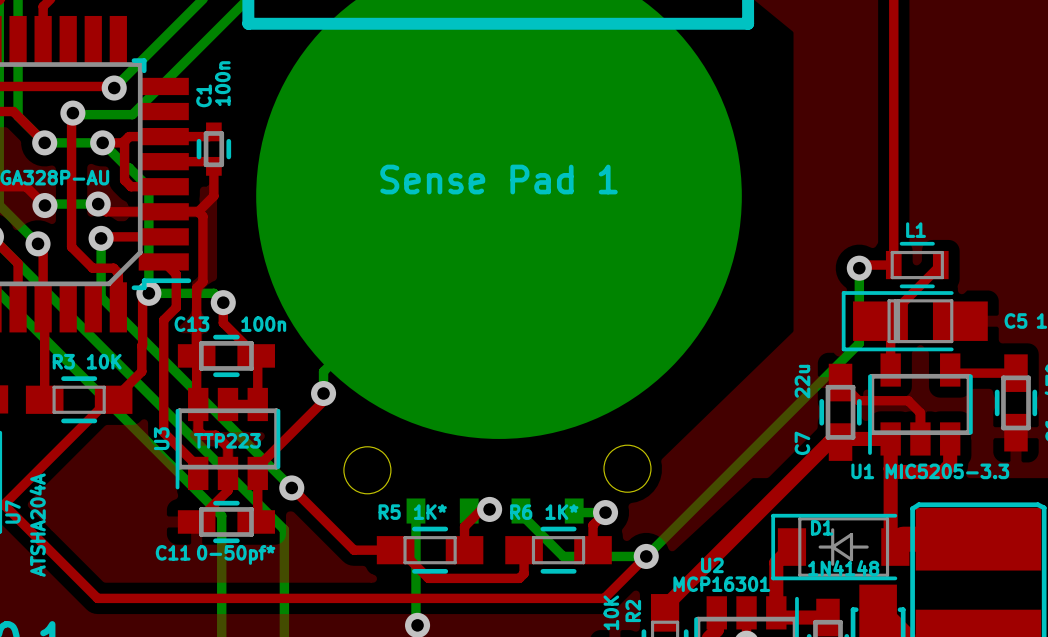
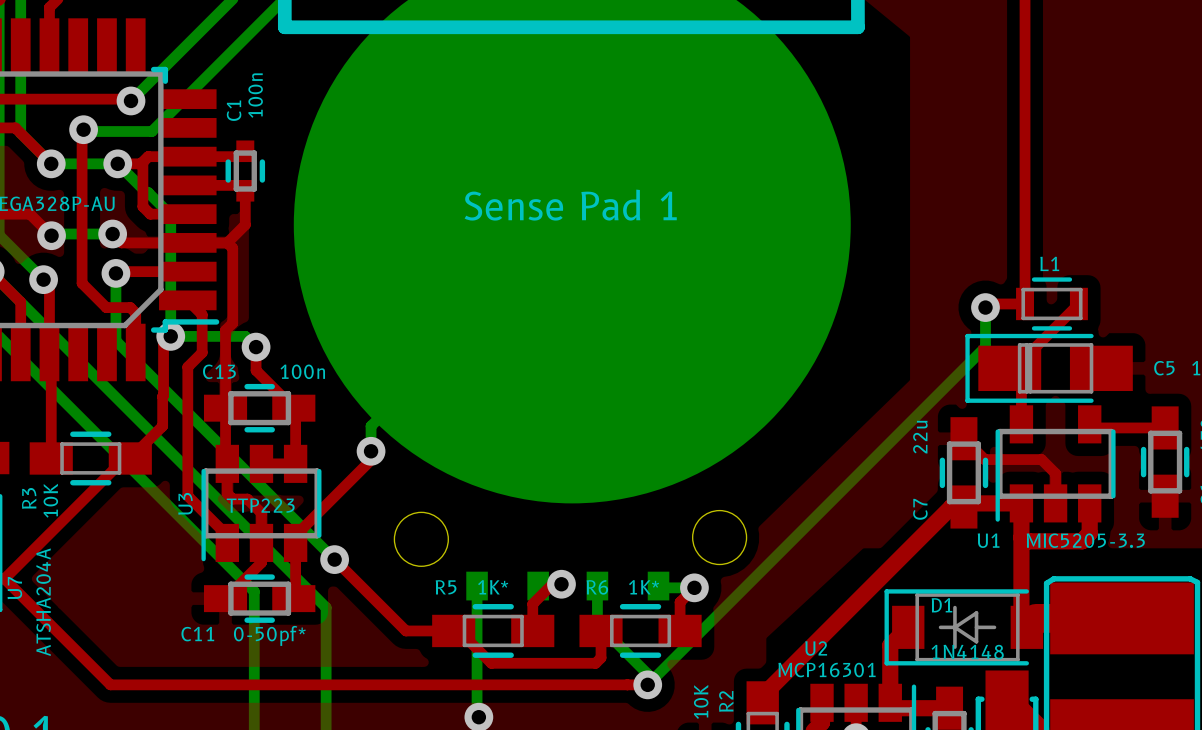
bottom track: (859, 302) (859, 343) (646, 556) (563, 556) (520, 514) -> (985, 347) (647, 684) (647, 674) (597, 623) (597, 589)
R3 name rotation: 0° (63, 361) -> 90° counterclockwise (29, 498)
R3 name position: R3 (63, 361) -> R3 (29, 498)
R3 value rotation: 0° (104, 361) -> 90° counterclockwise (50, 500)
R3 value position: 10K (104, 361) -> 10K (50, 500)
top track: (646, 556) (604, 598) (96, 597) -> (647, 684) (110, 684)
via position: (646, 556) -> (647, 684)

